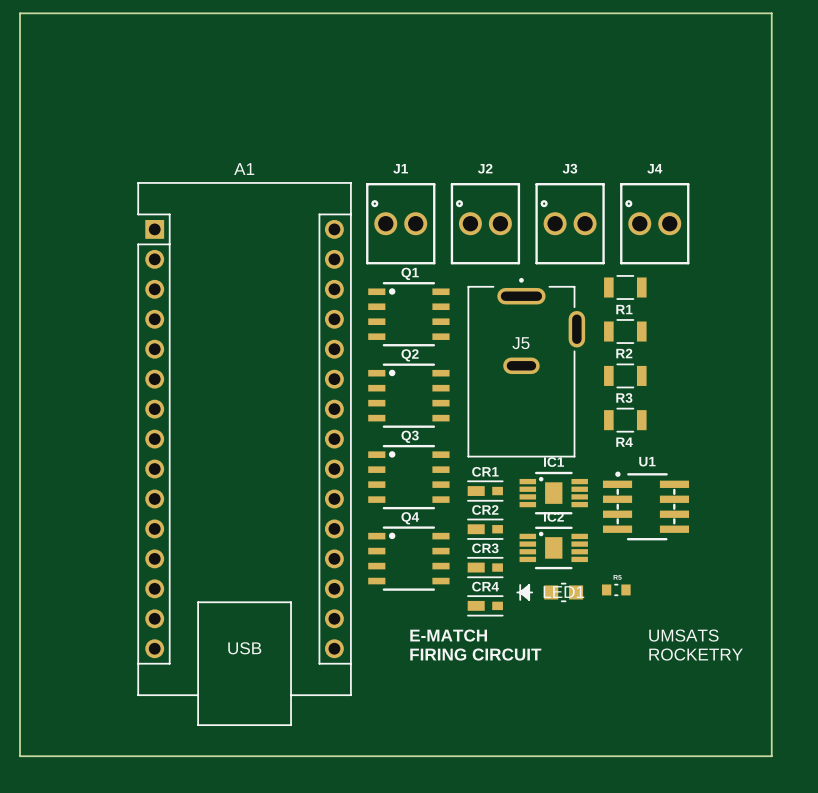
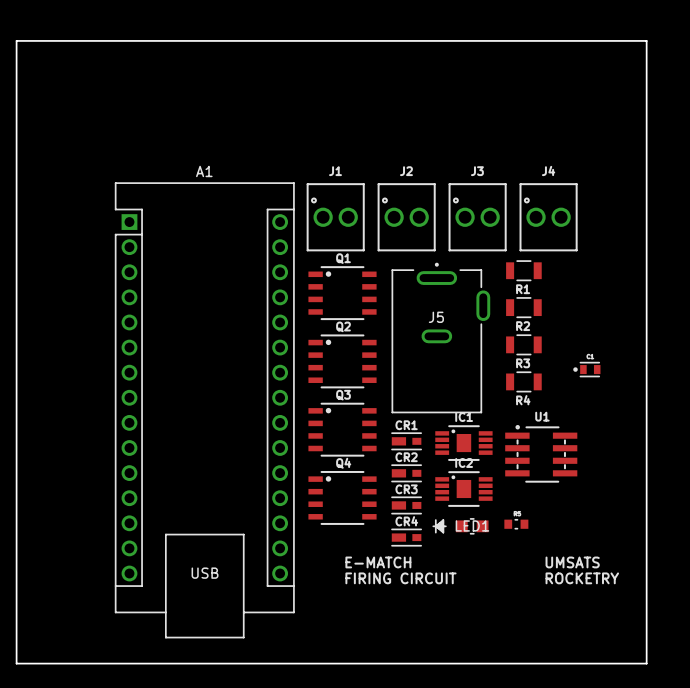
part: none -> (586, 369)

